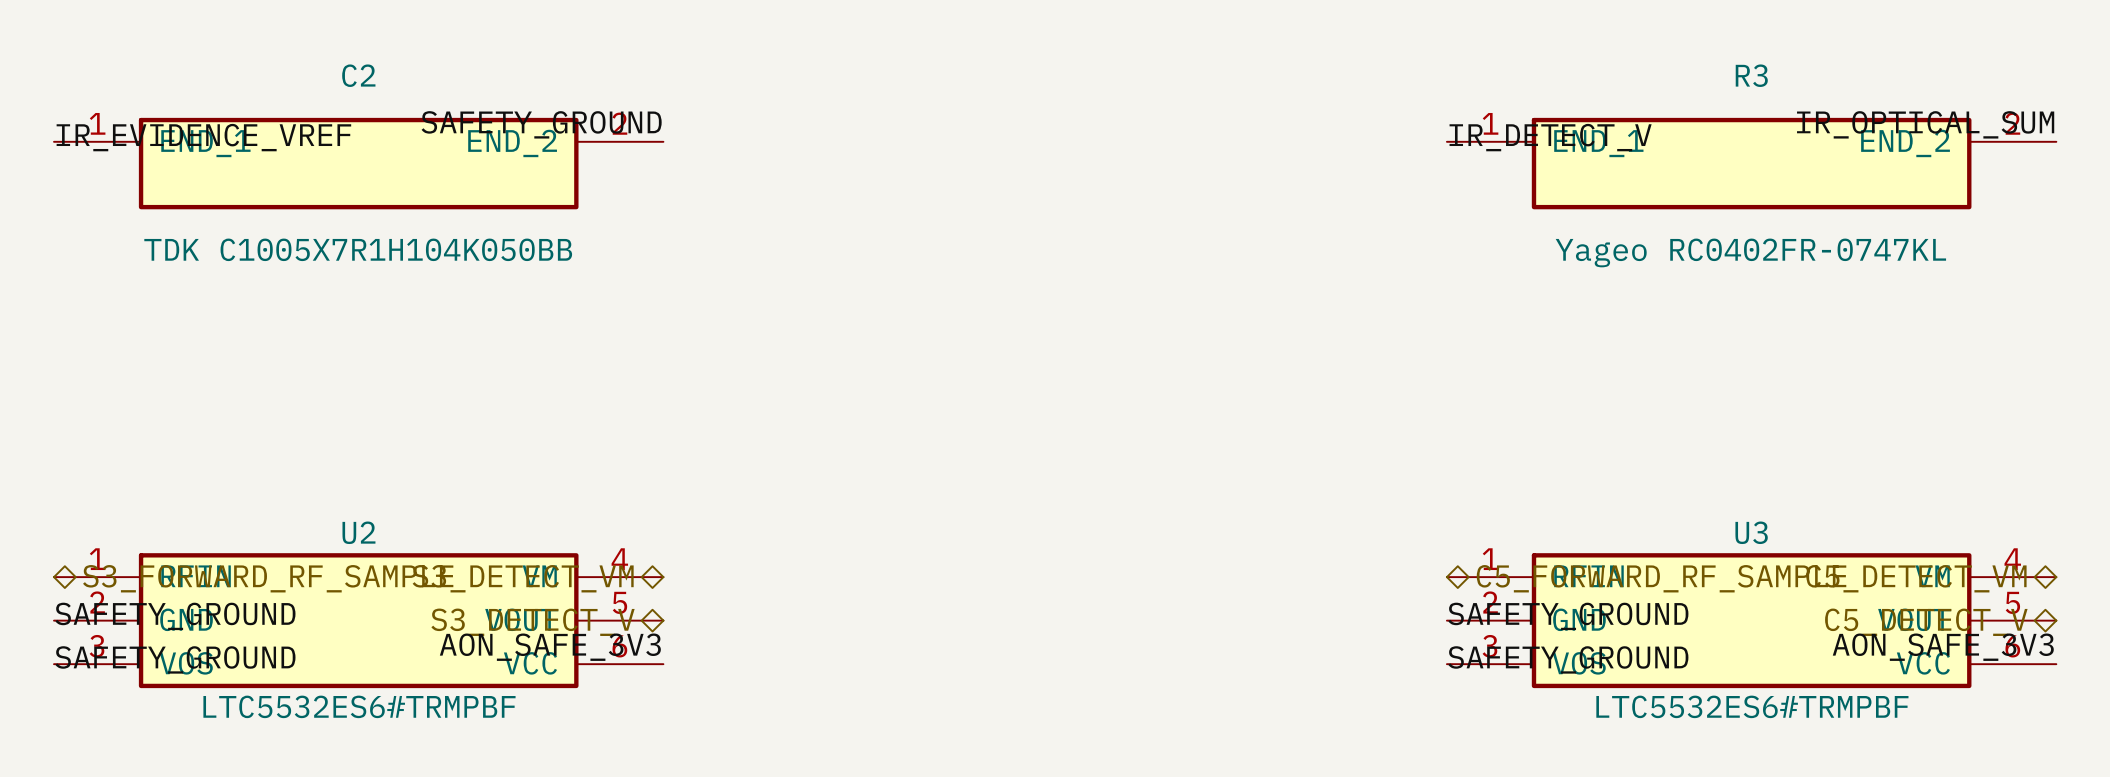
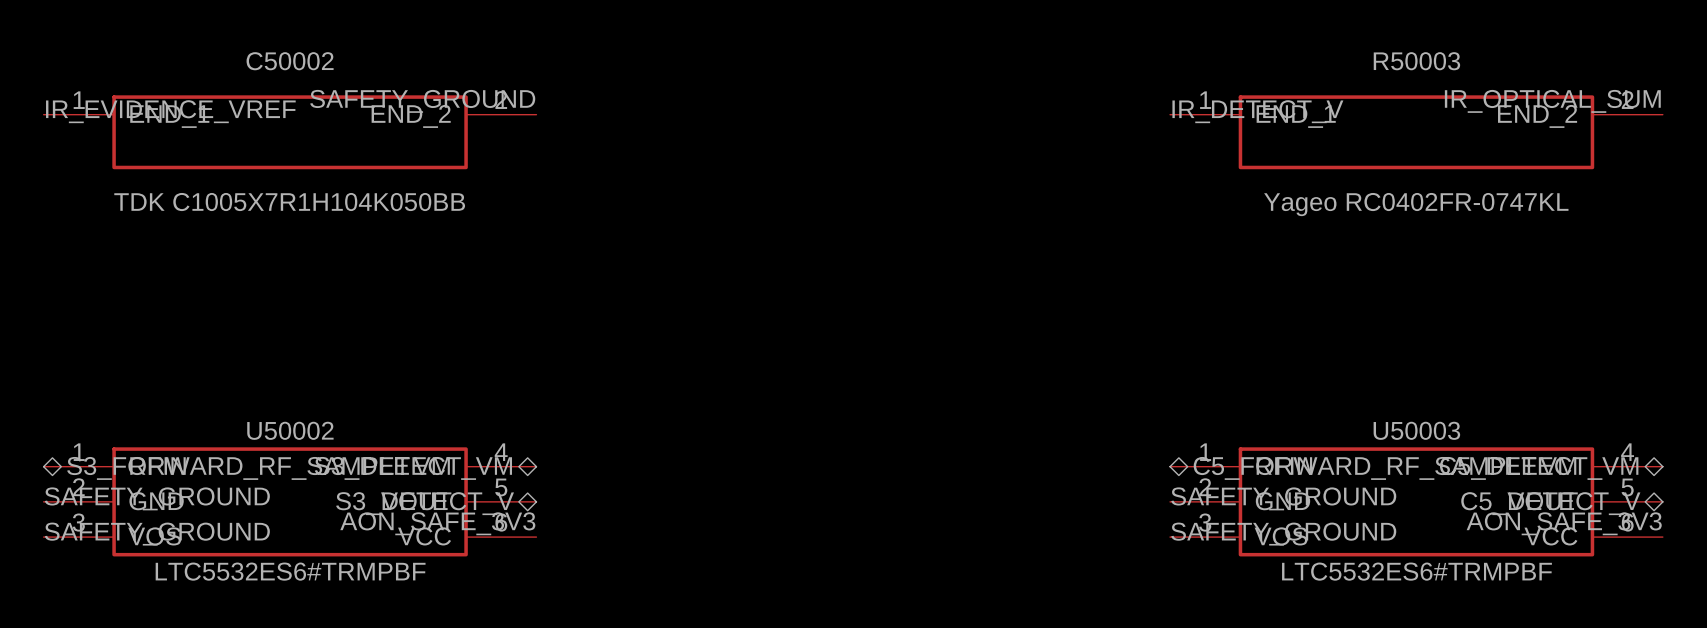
C2 name: C2 (358, 75) -> C50002 (290, 61)
R3 name: R3 (1751, 75) -> R50003 (1416, 61)
U2 name: U2 (358, 532) -> U50002 (290, 430)
U3 name: U3 (1751, 532) -> U50003 (1416, 430)

